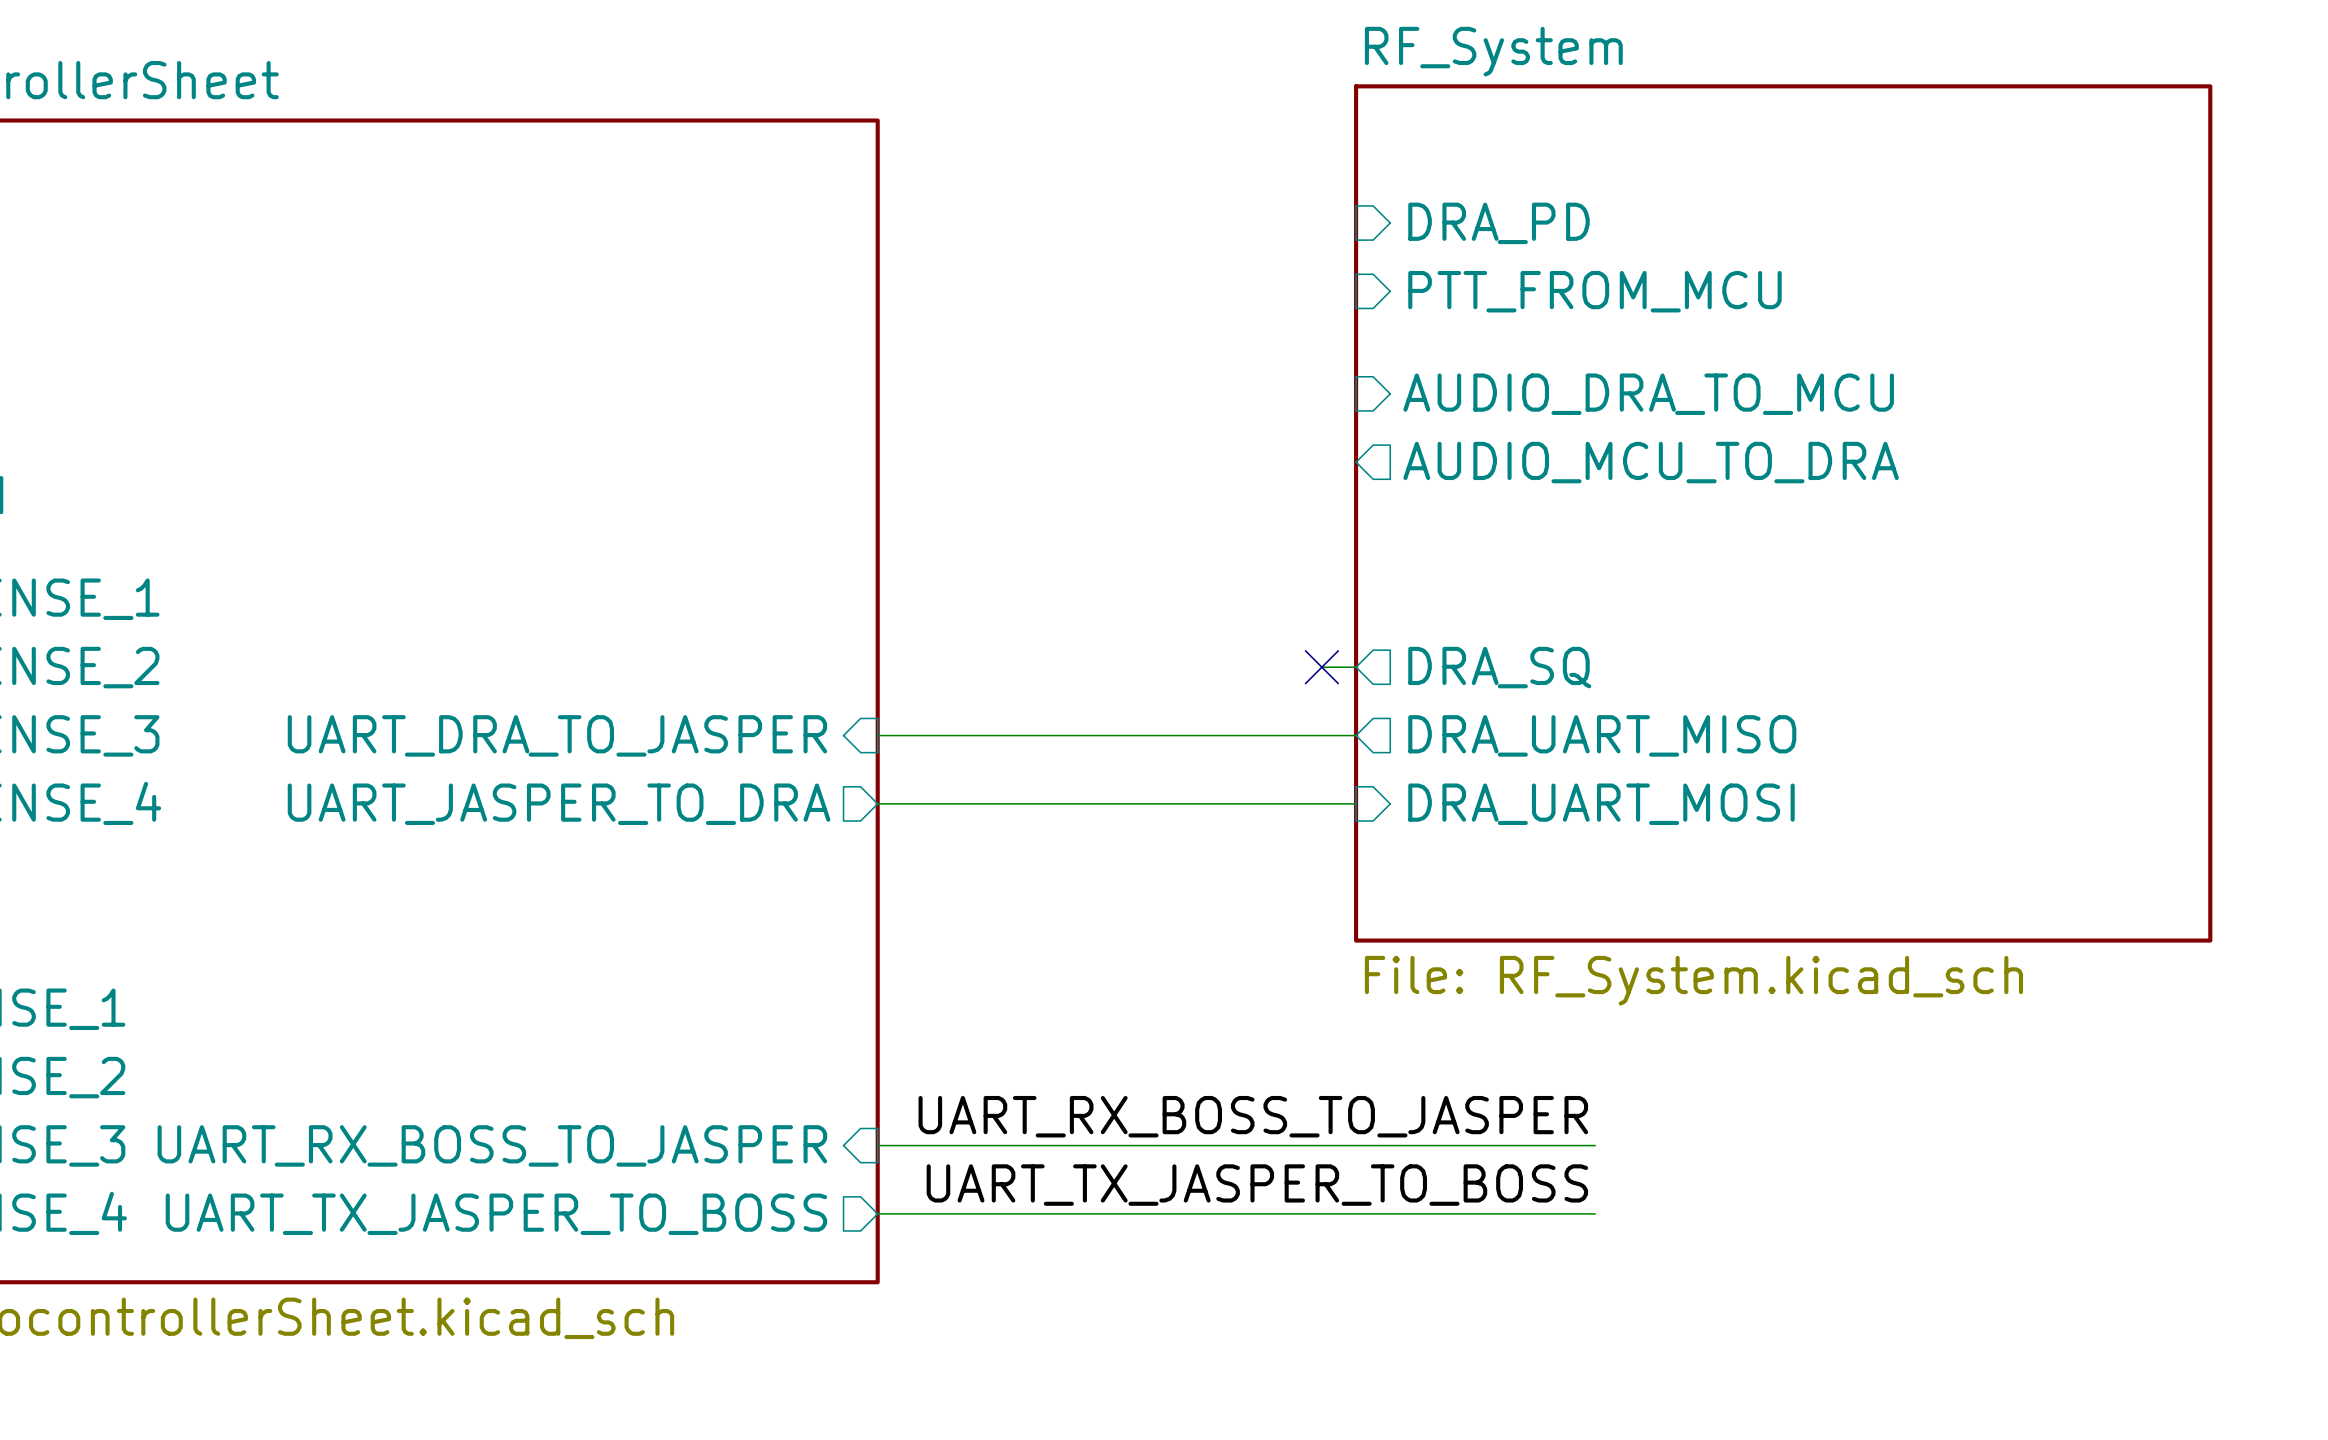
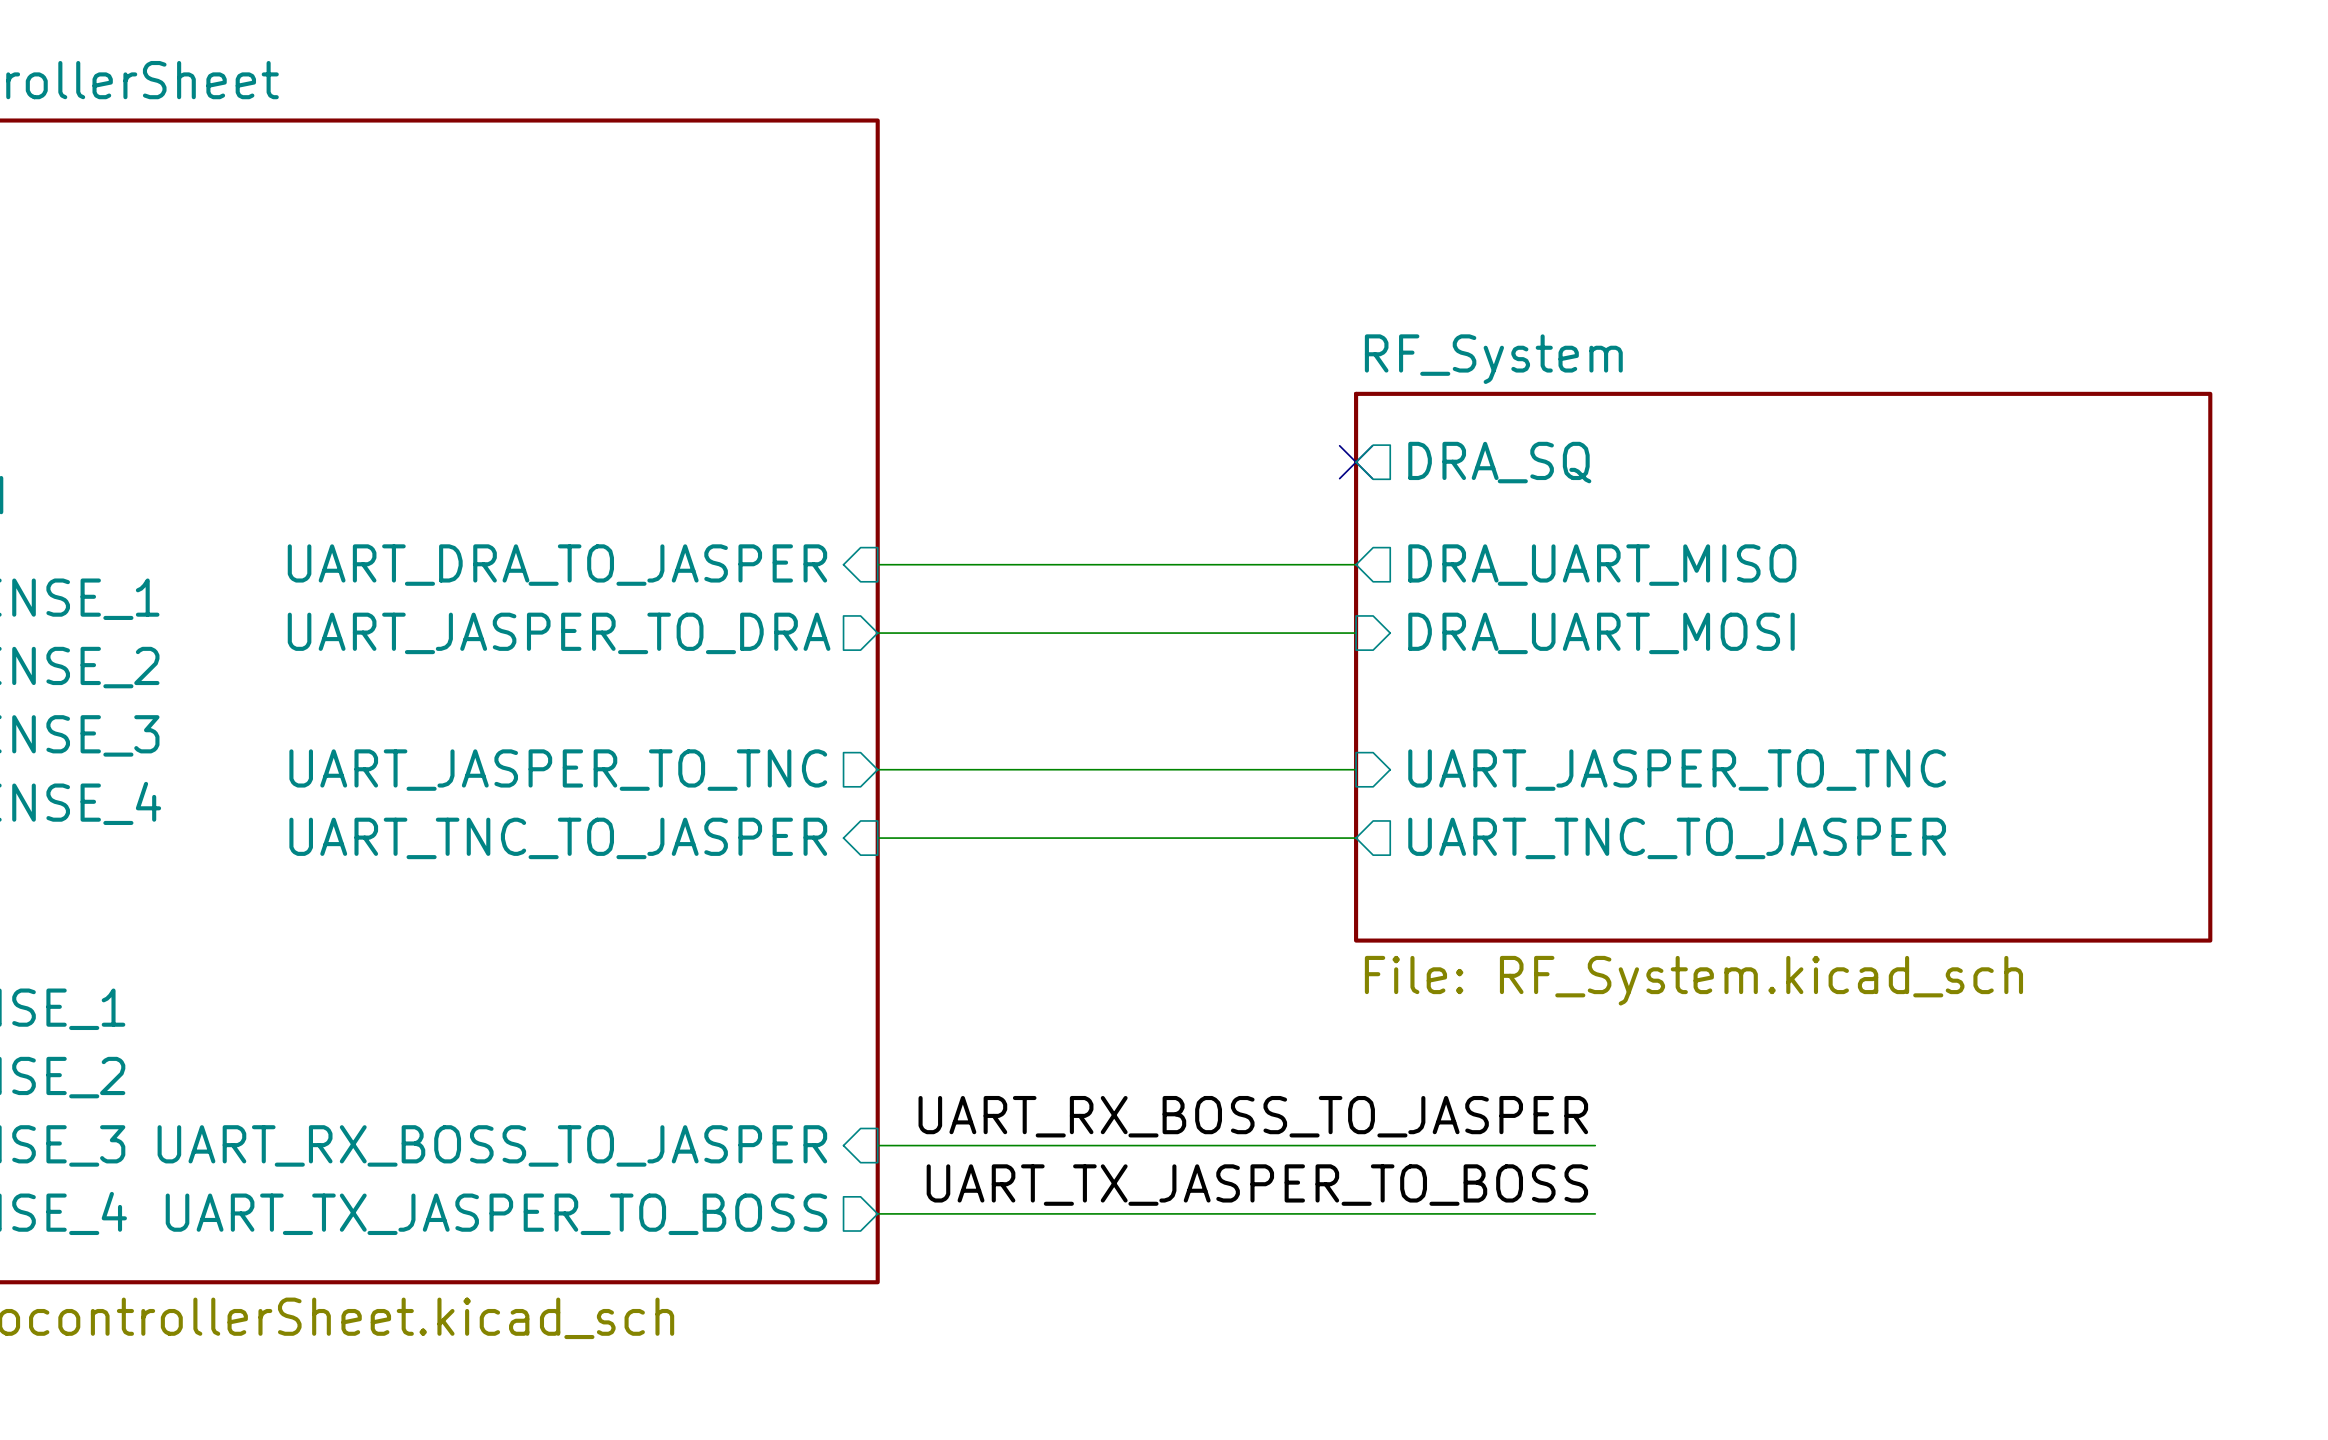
sheet pin: DRA_PD (1498, 223) -> none
sheet pin: PTT_FROM_MCU (1594, 291) -> none
sheet pin: AUDIO_DRA_TO_MCU (1648, 394) -> none
no-connect mark: none -> (1356, 462)
sheet pin: AUDIO_MCU_TO_DRA (1651, 462) -> DRA_SQ (1499, 462)
sheet RF_System: File: RF_System.kicad_sch (1783, 513) -> none
wire: none -> (877, 564) (1356, 564)
wire: none -> (877, 633) (1356, 633)
wire: (1321, 667) (1356, 667) -> none
no-connect mark: (1321, 667) -> none
sheet pin: DRA_SQ (1499, 667) -> none
sheet RF_System: none -> File: RF_System.kicad_sch (1783, 667)
sheet pin position: UART_DRA_TO_JASPER (557, 735) -> UART_DRA_TO_JASPER (557, 565)
wire: (877, 735) (1356, 735) -> (877, 769) (1356, 769)
sheet pin position: DRA_UART_MISO (1602, 735) -> DRA_UART_MISO (1602, 565)
sheet pin: none -> UART_JASPER_TO_TNC (558, 770)
sheet pin: none -> UART_JASPER_TO_TNC (1677, 770)
wire: (877, 803) (1356, 803) -> (877, 838) (1356, 838)
sheet pin position: UART_JASPER_TO_DRA (559, 804) -> UART_JASPER_TO_DRA (559, 633)
sheet pin position: DRA_UART_MOSI (1601, 804) -> DRA_UART_MOSI (1601, 633)
sheet pin: none -> UART_TNC_TO_JASPER (558, 838)
sheet pin: none -> UART_TNC_TO_JASPER (1677, 838)

